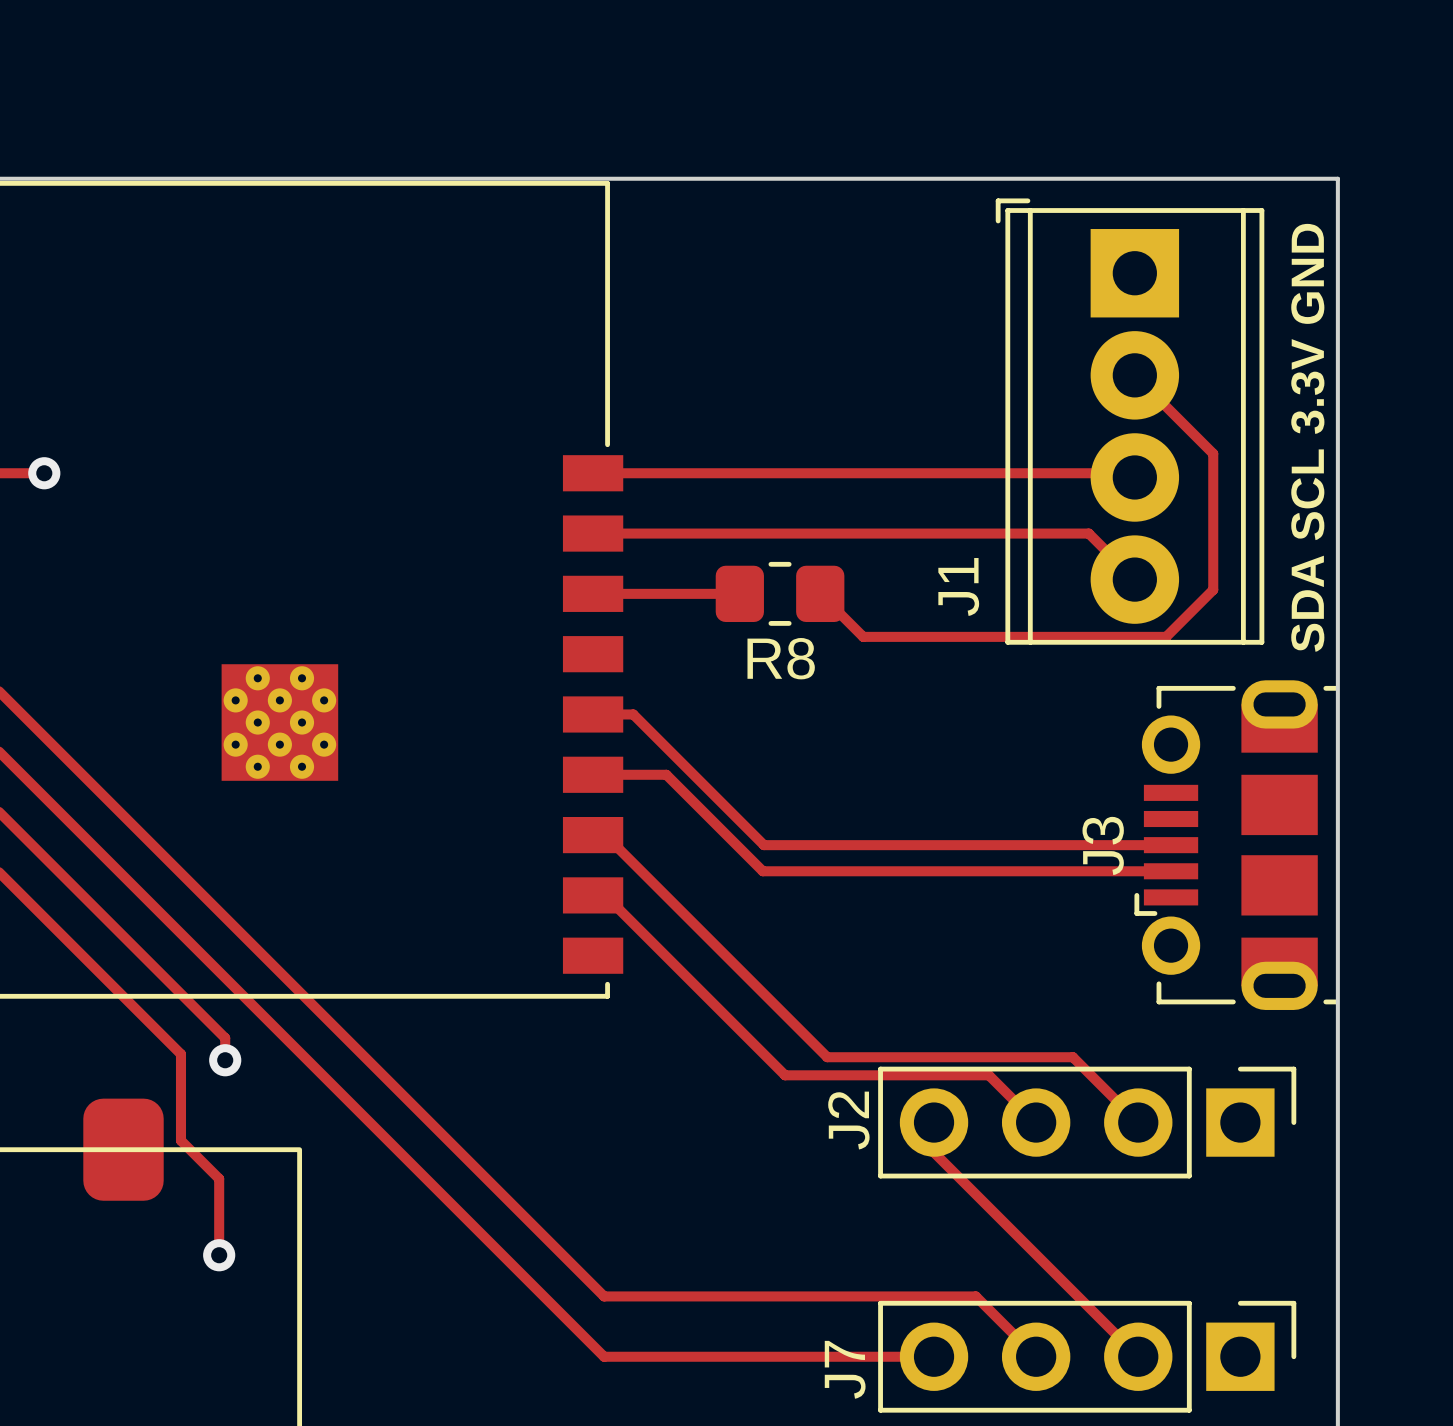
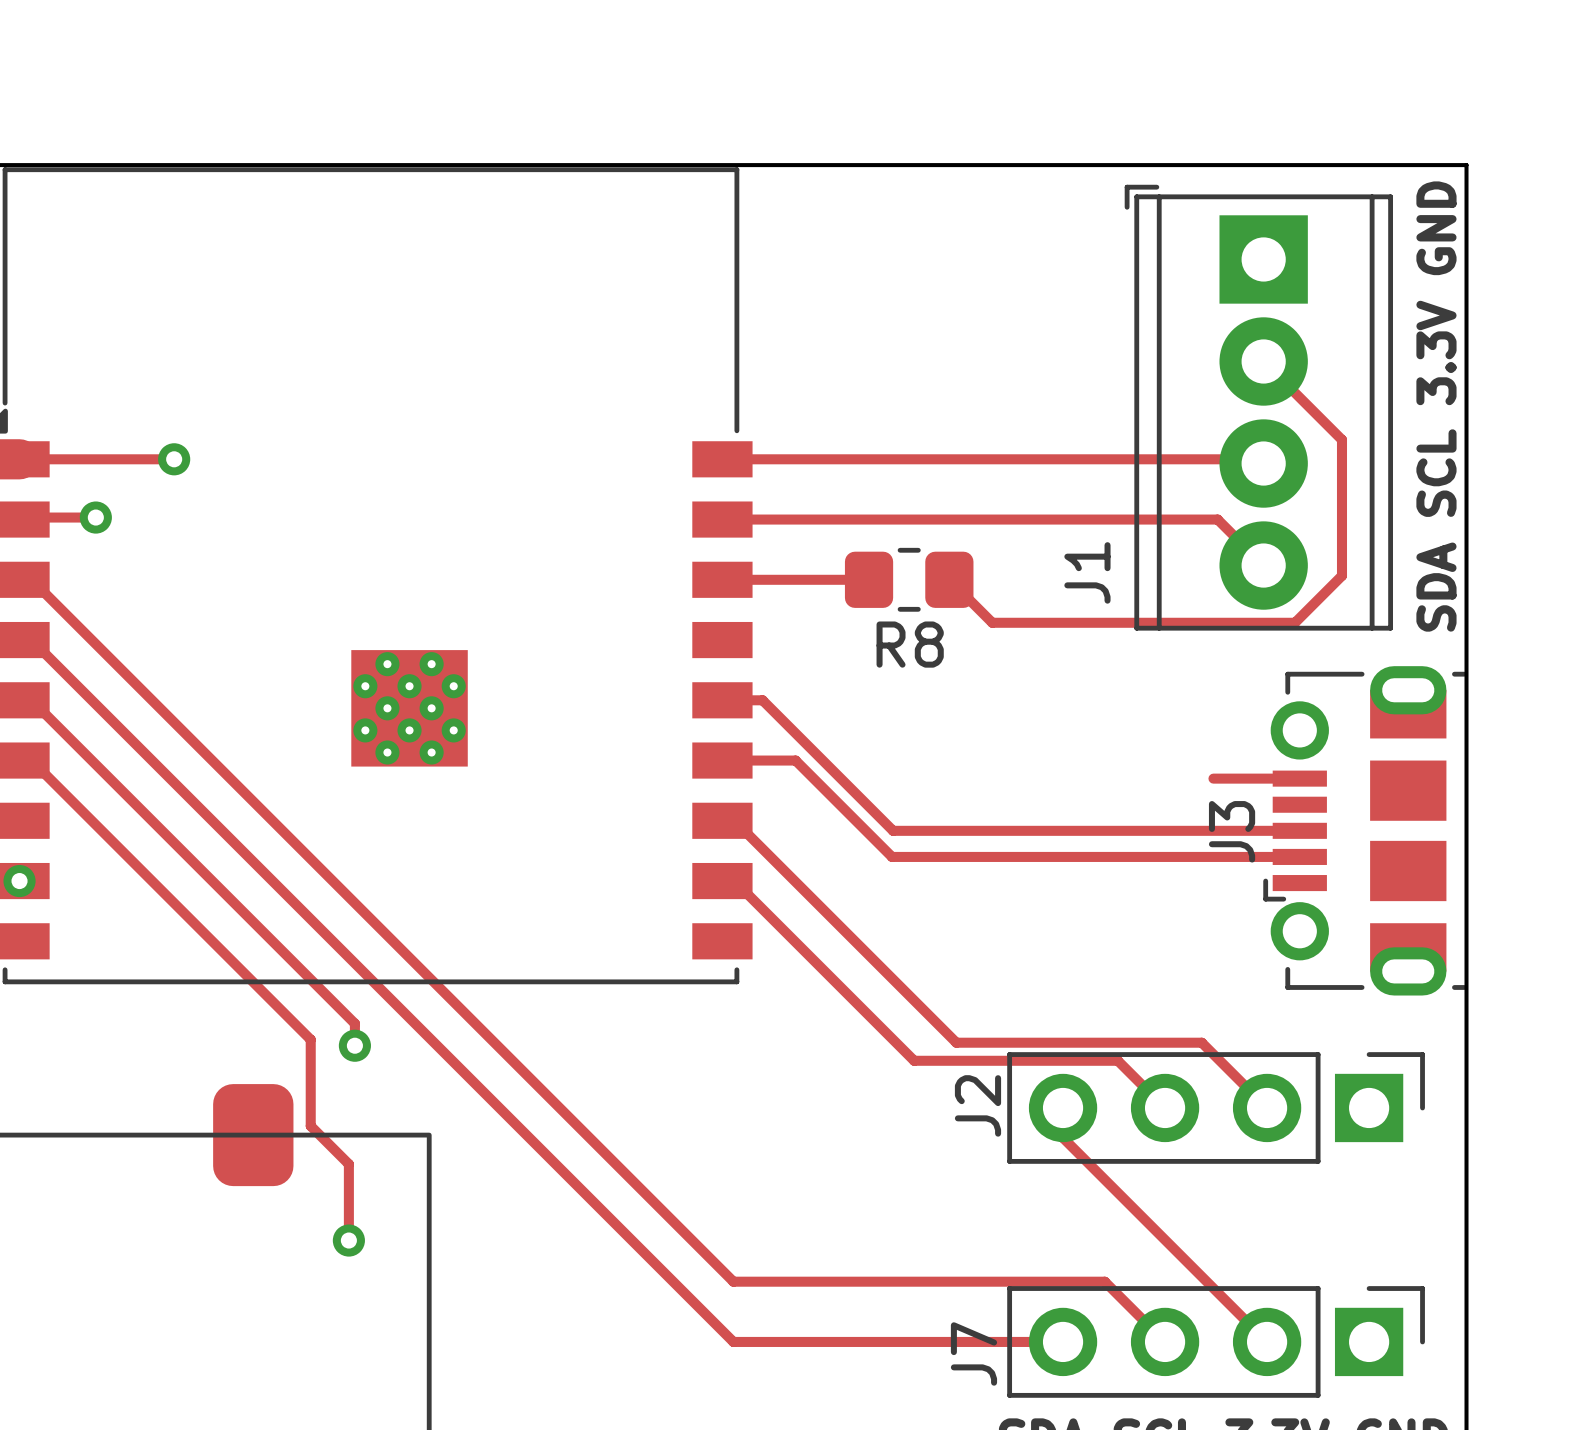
track: none -> (1213, 778) (1299, 778)

